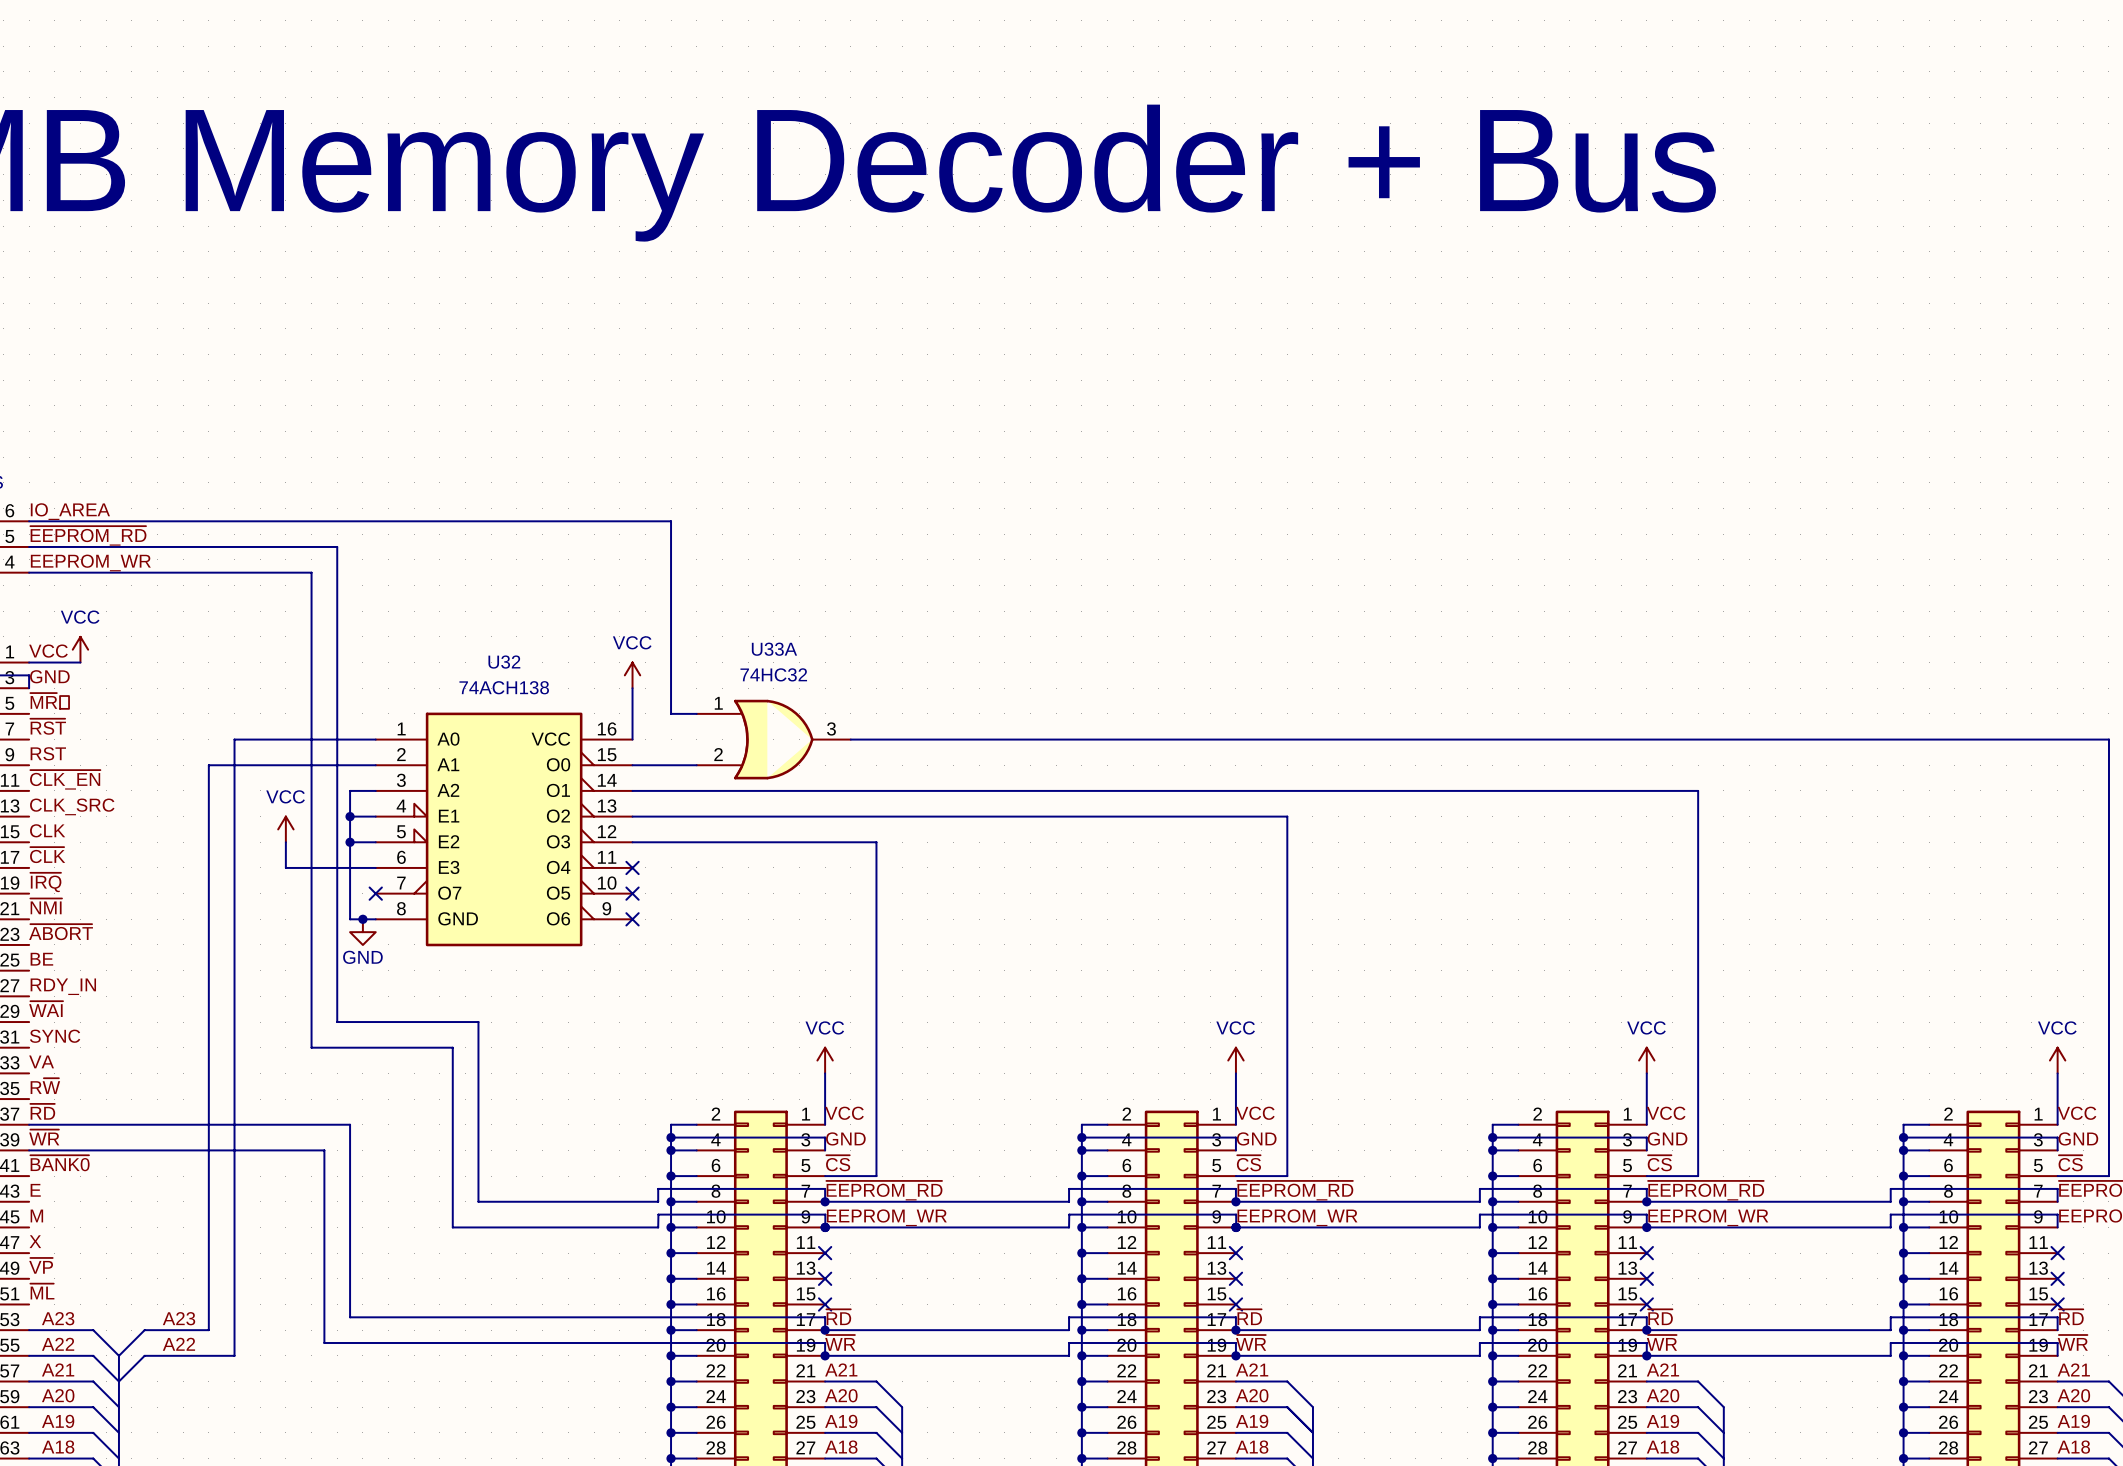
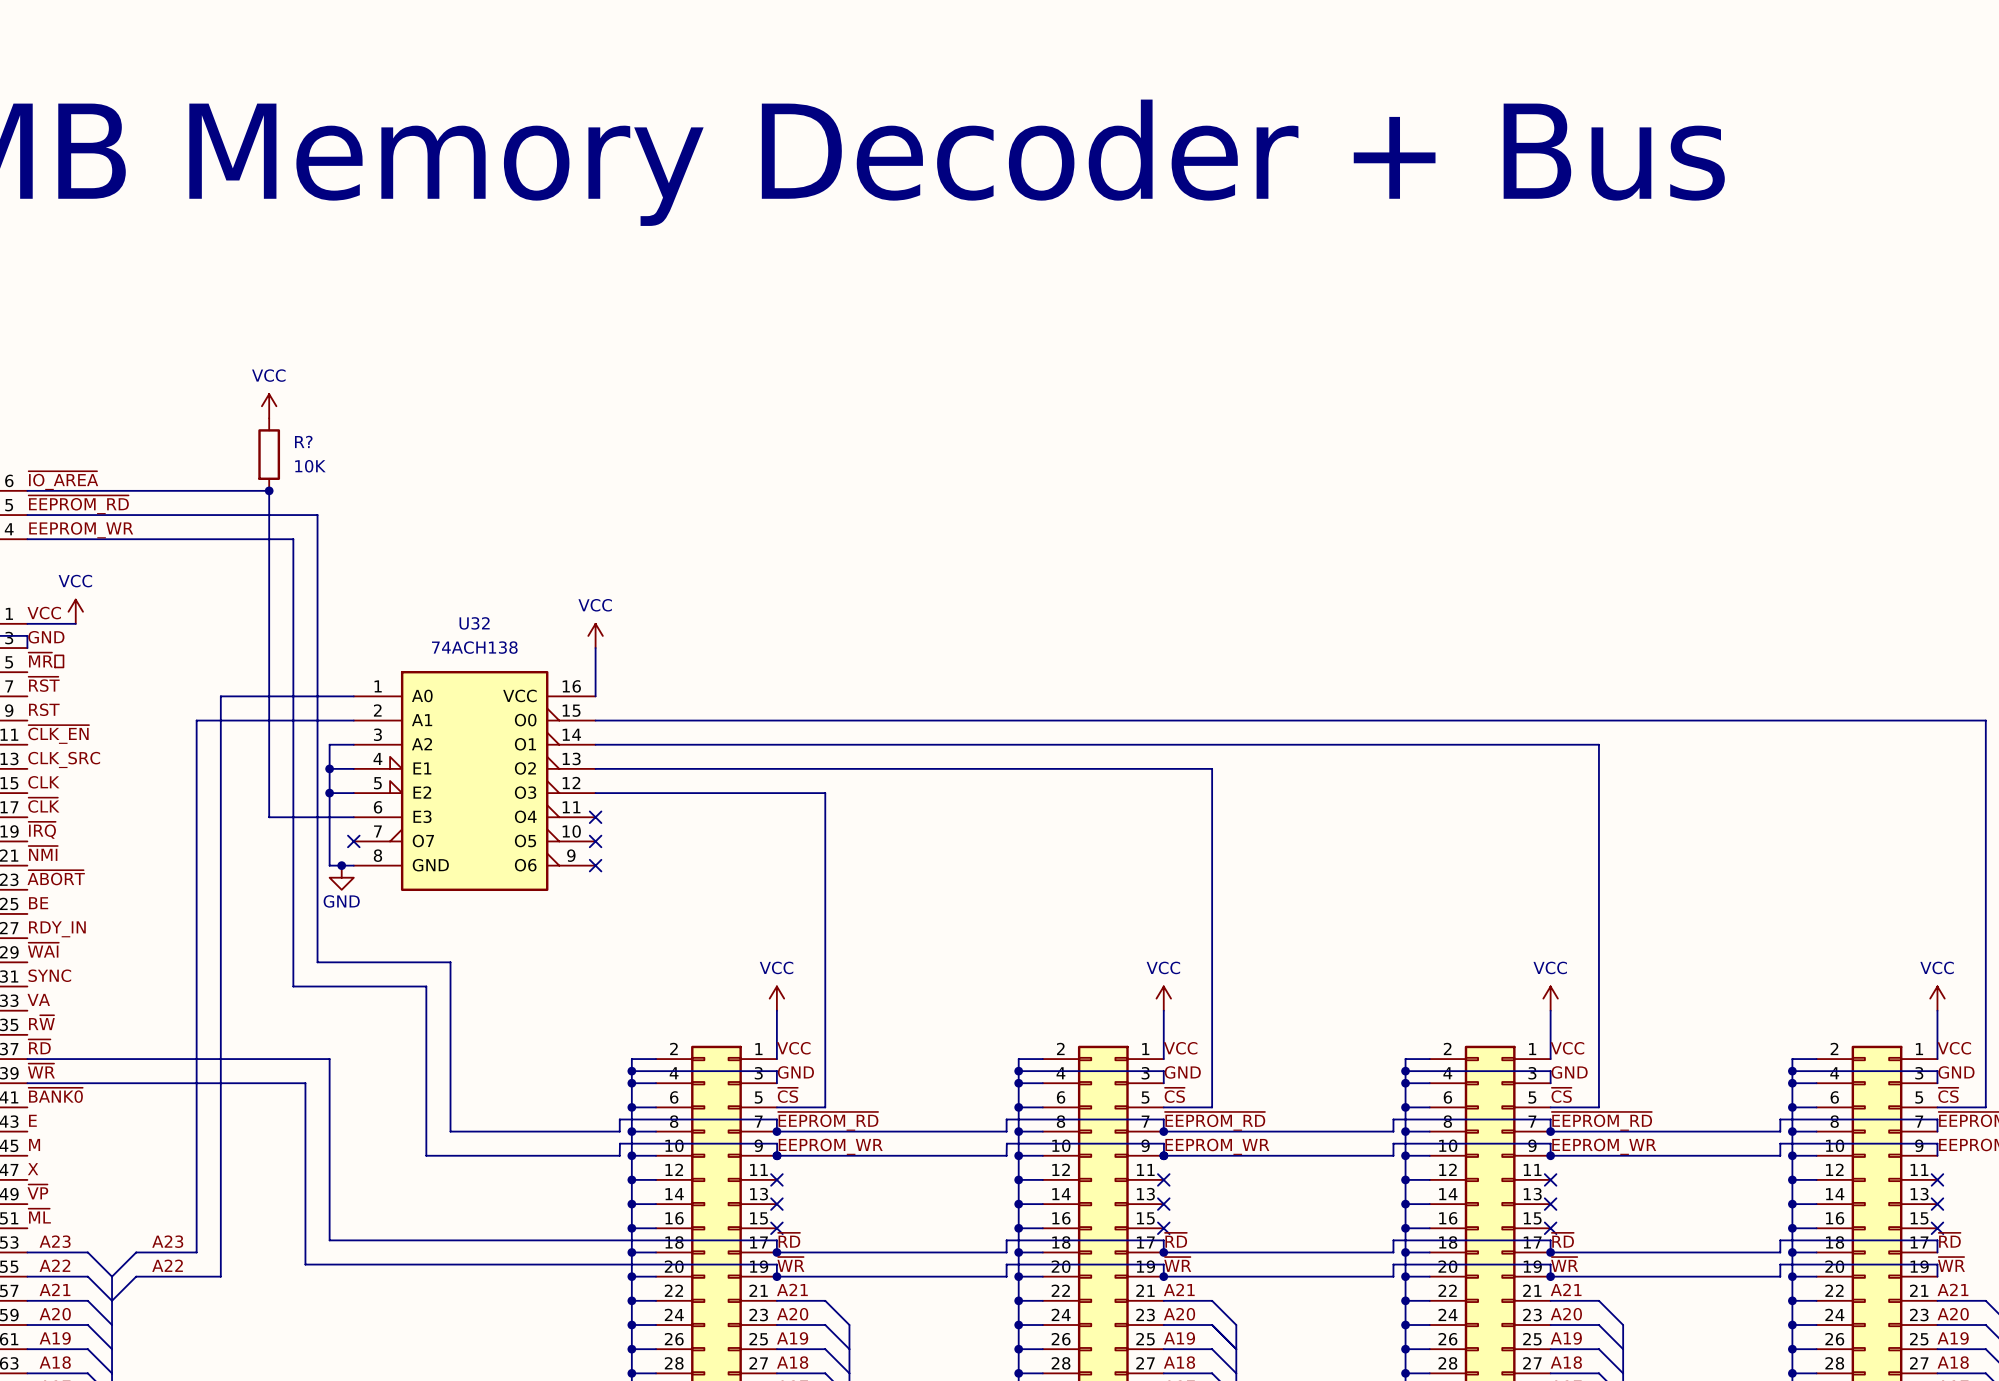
power symbol: none -> VCC (269, 406)
R?: none -> 10K (269, 454)
label: IO_AREA (70, 511) -> ~{IO_AREA} (63, 480)
wire: (285, 521) (671, 521) (671, 713) (696, 713) -> (269, 490) (269, 793)
junction: none -> (269, 490)
U33A: 74HC32 (773, 739) -> none
wire: (850, 739) (2108, 739) (2108, 765) -> (656, 720) (1985, 720)
power symbol: VCC (285, 829) -> none

